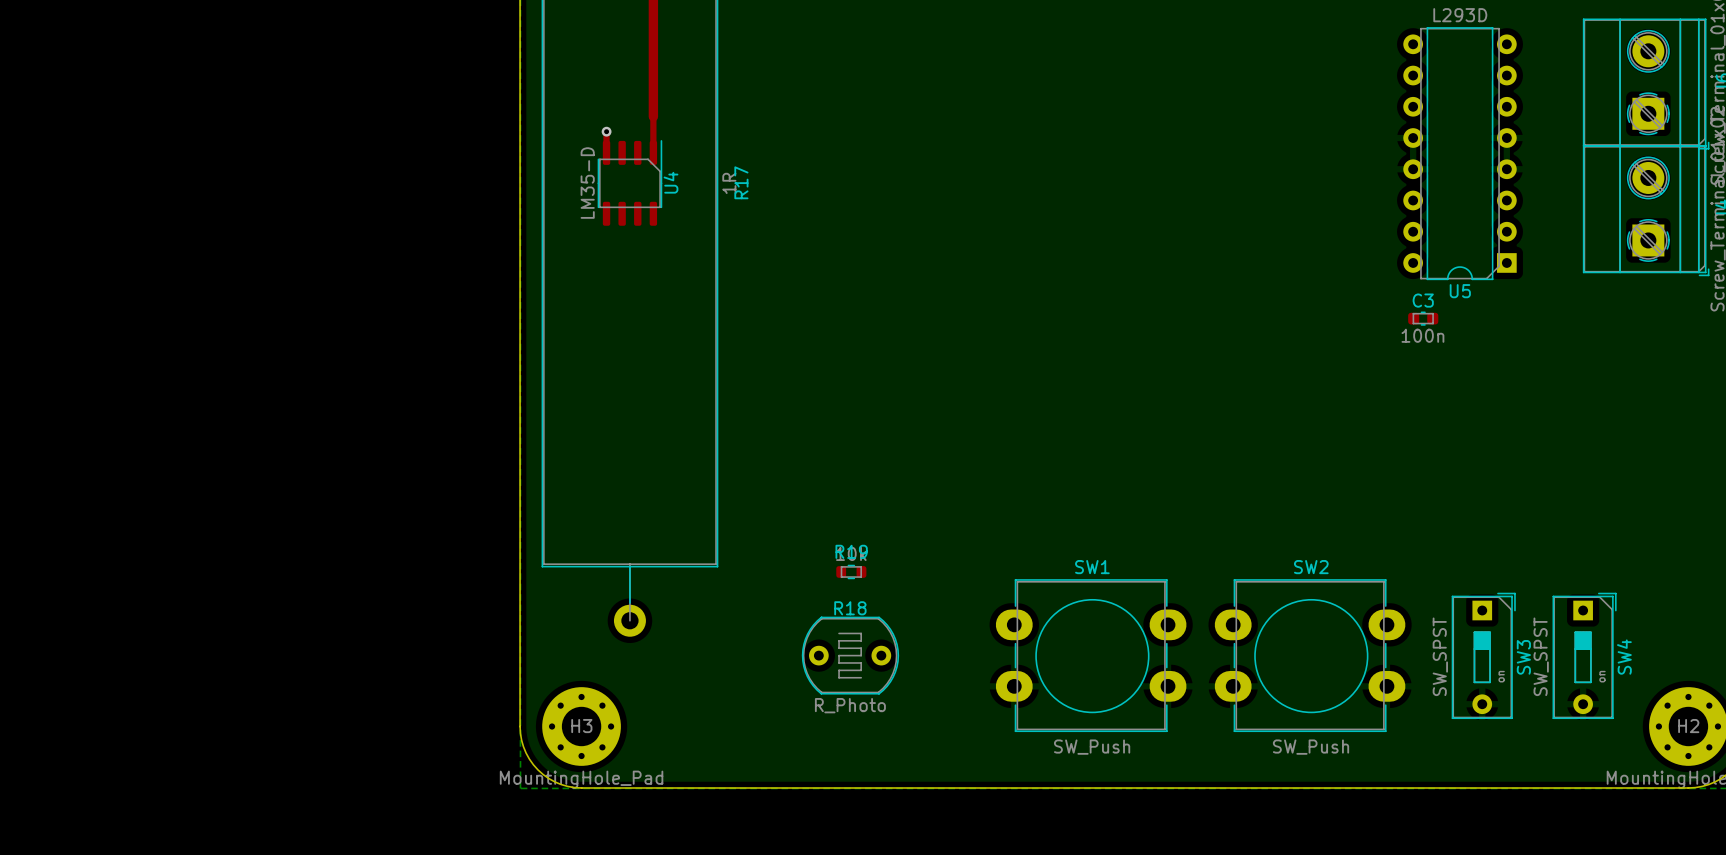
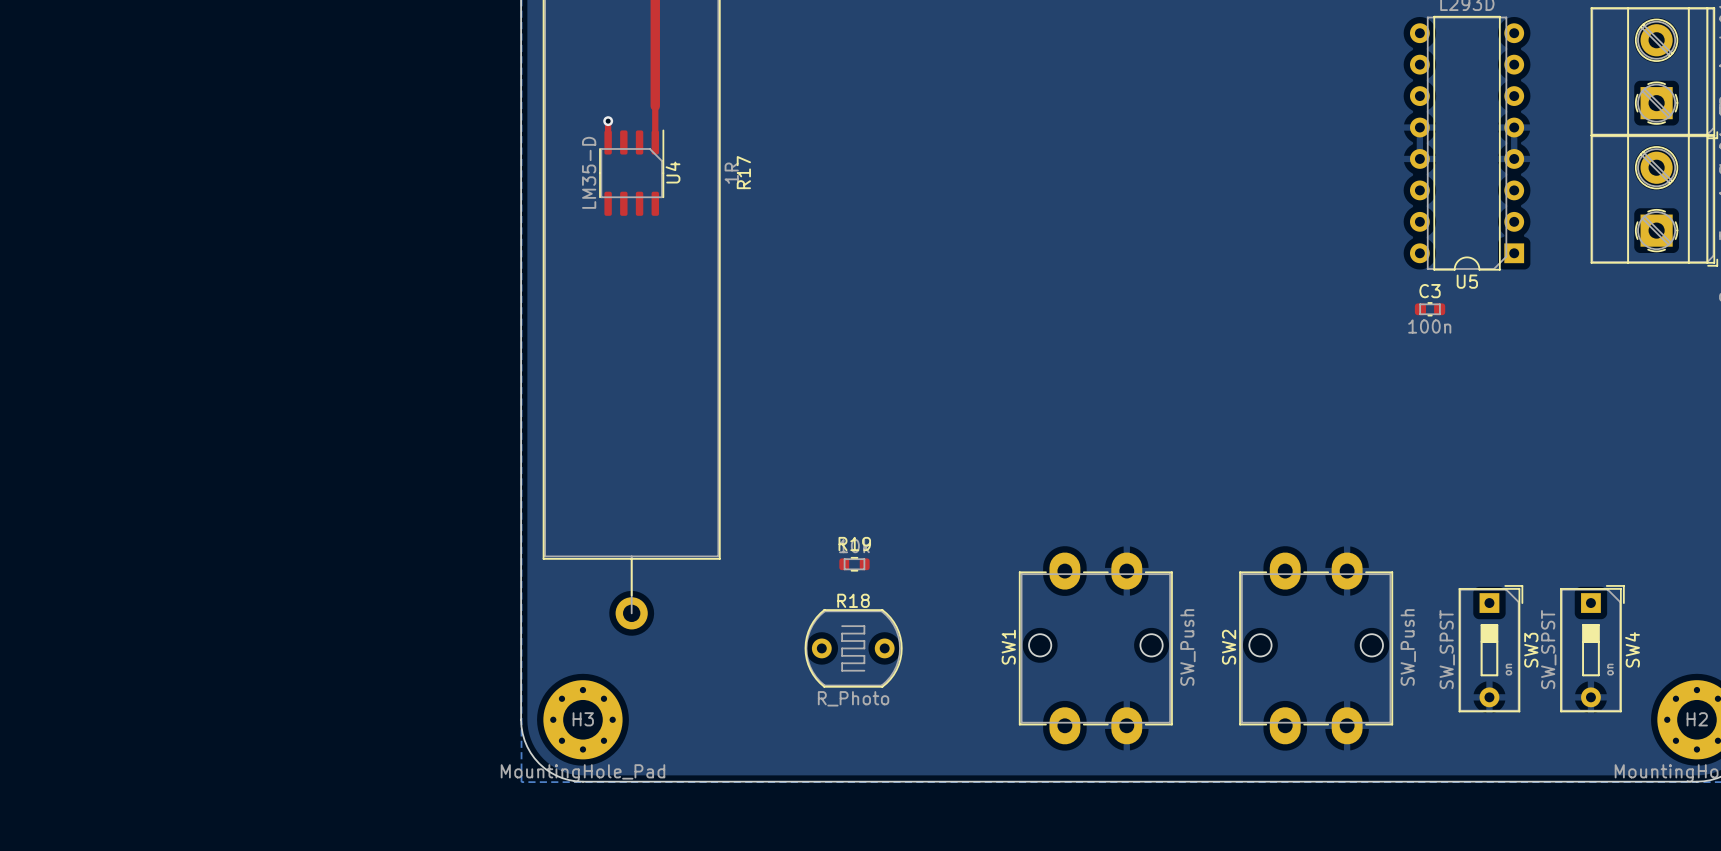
SW1 name position: SW1 (1092, 567) -> SW1 (1008, 647)
SW2 name position: SW2 (1311, 567) -> SW2 (1229, 647)
SW1 footprint: [995, 579, 1187, 732] -> [1018, 552, 1173, 745]
SW2 footprint: [1214, 579, 1406, 732] -> [1239, 552, 1394, 745]
SW1 value position: SW_Push (1092, 747) -> SW_Push (1187, 647)
SW2 value position: SW_Push (1311, 747) -> SW_Push (1408, 647)

